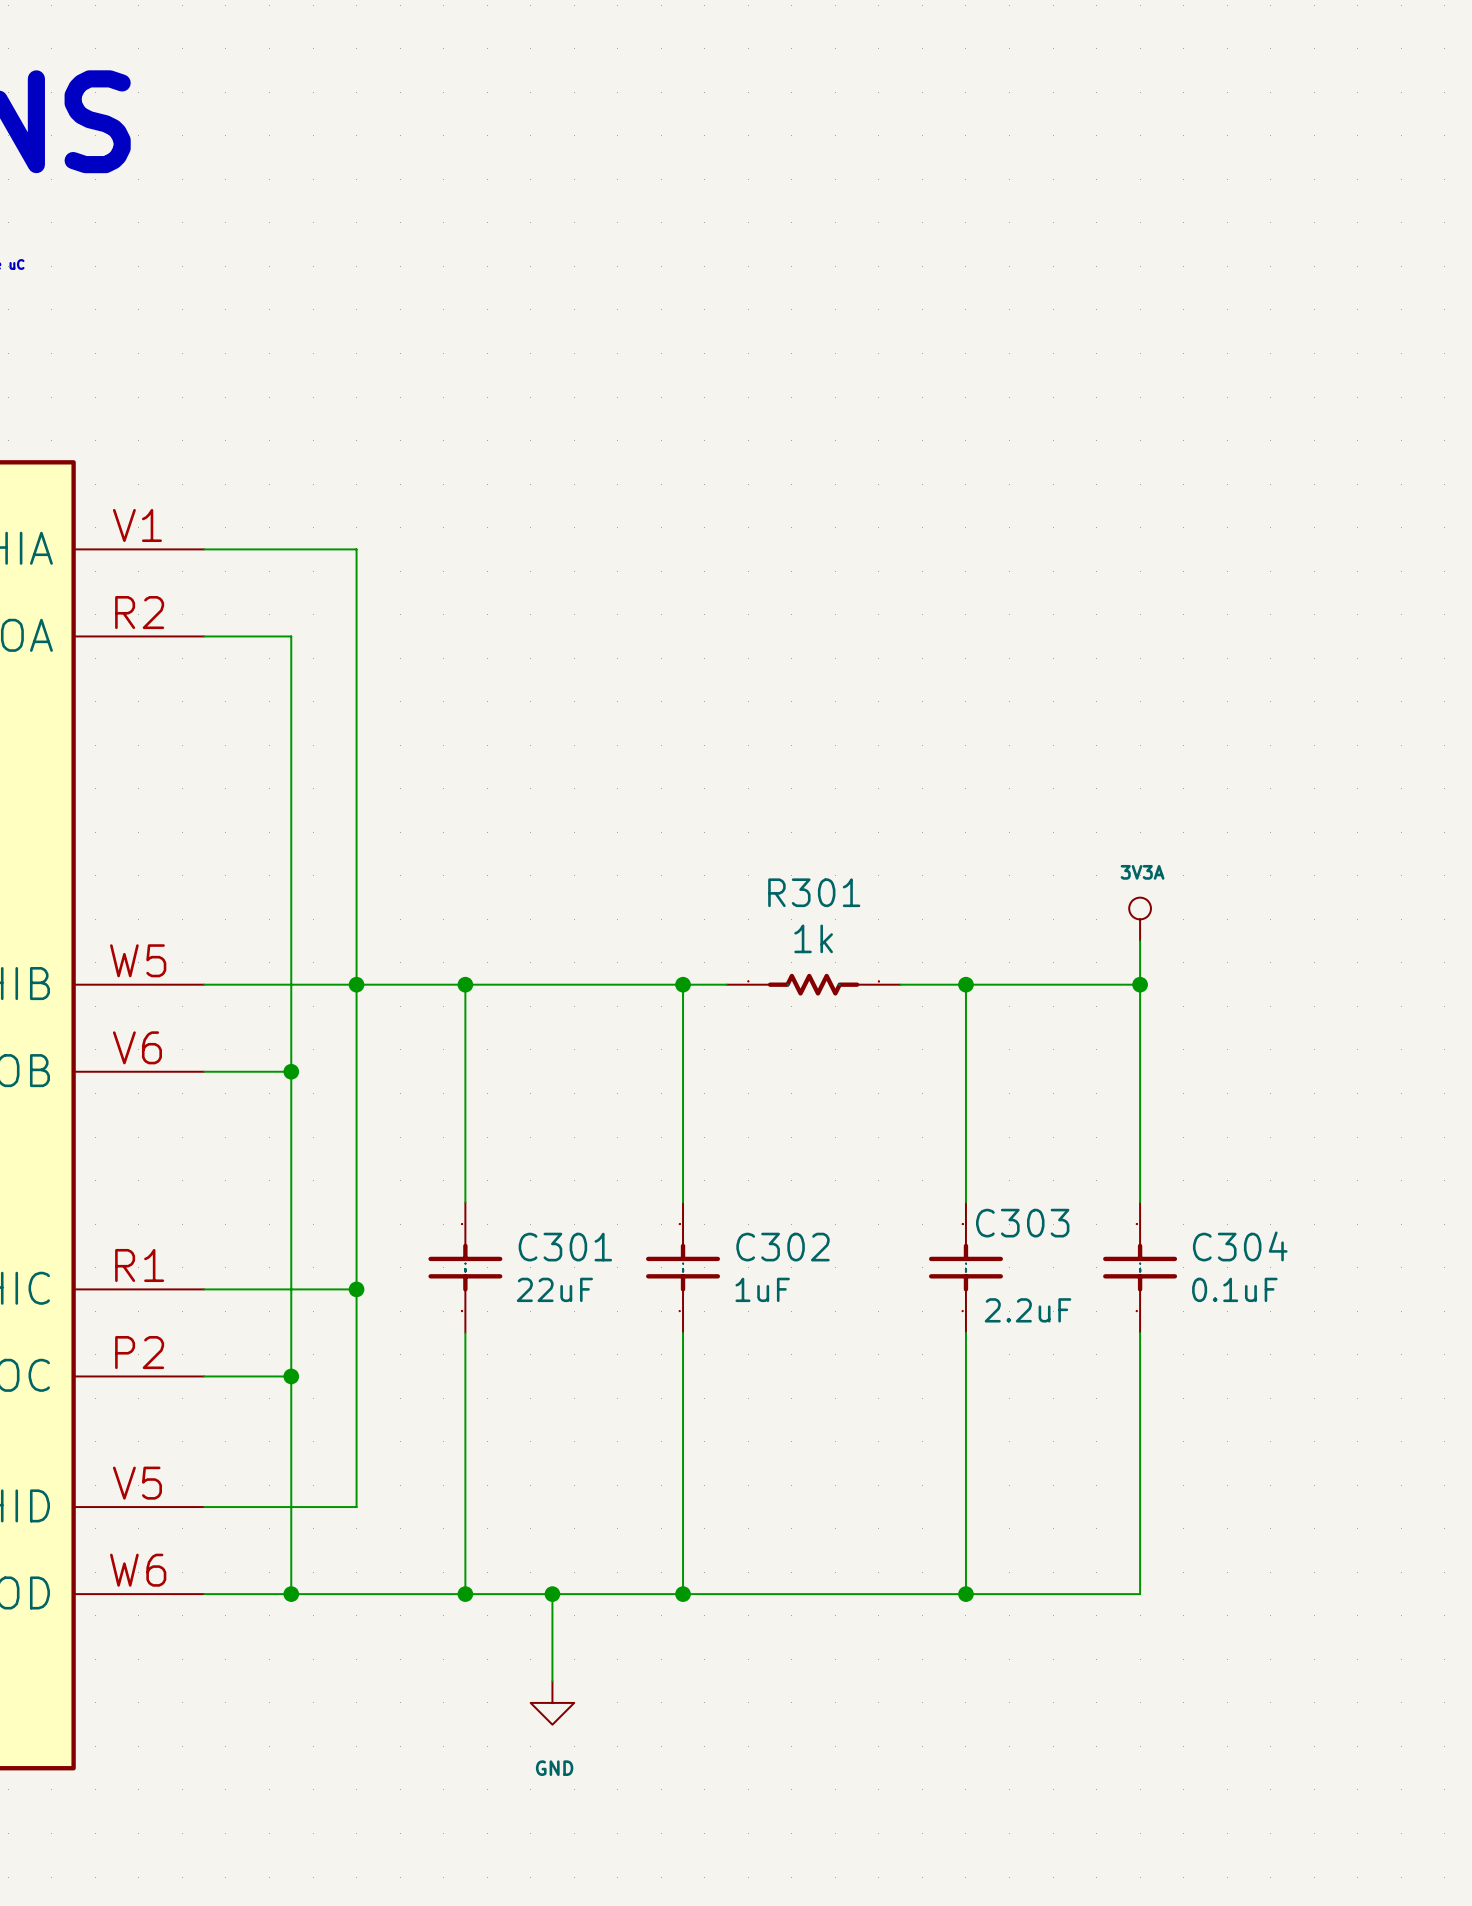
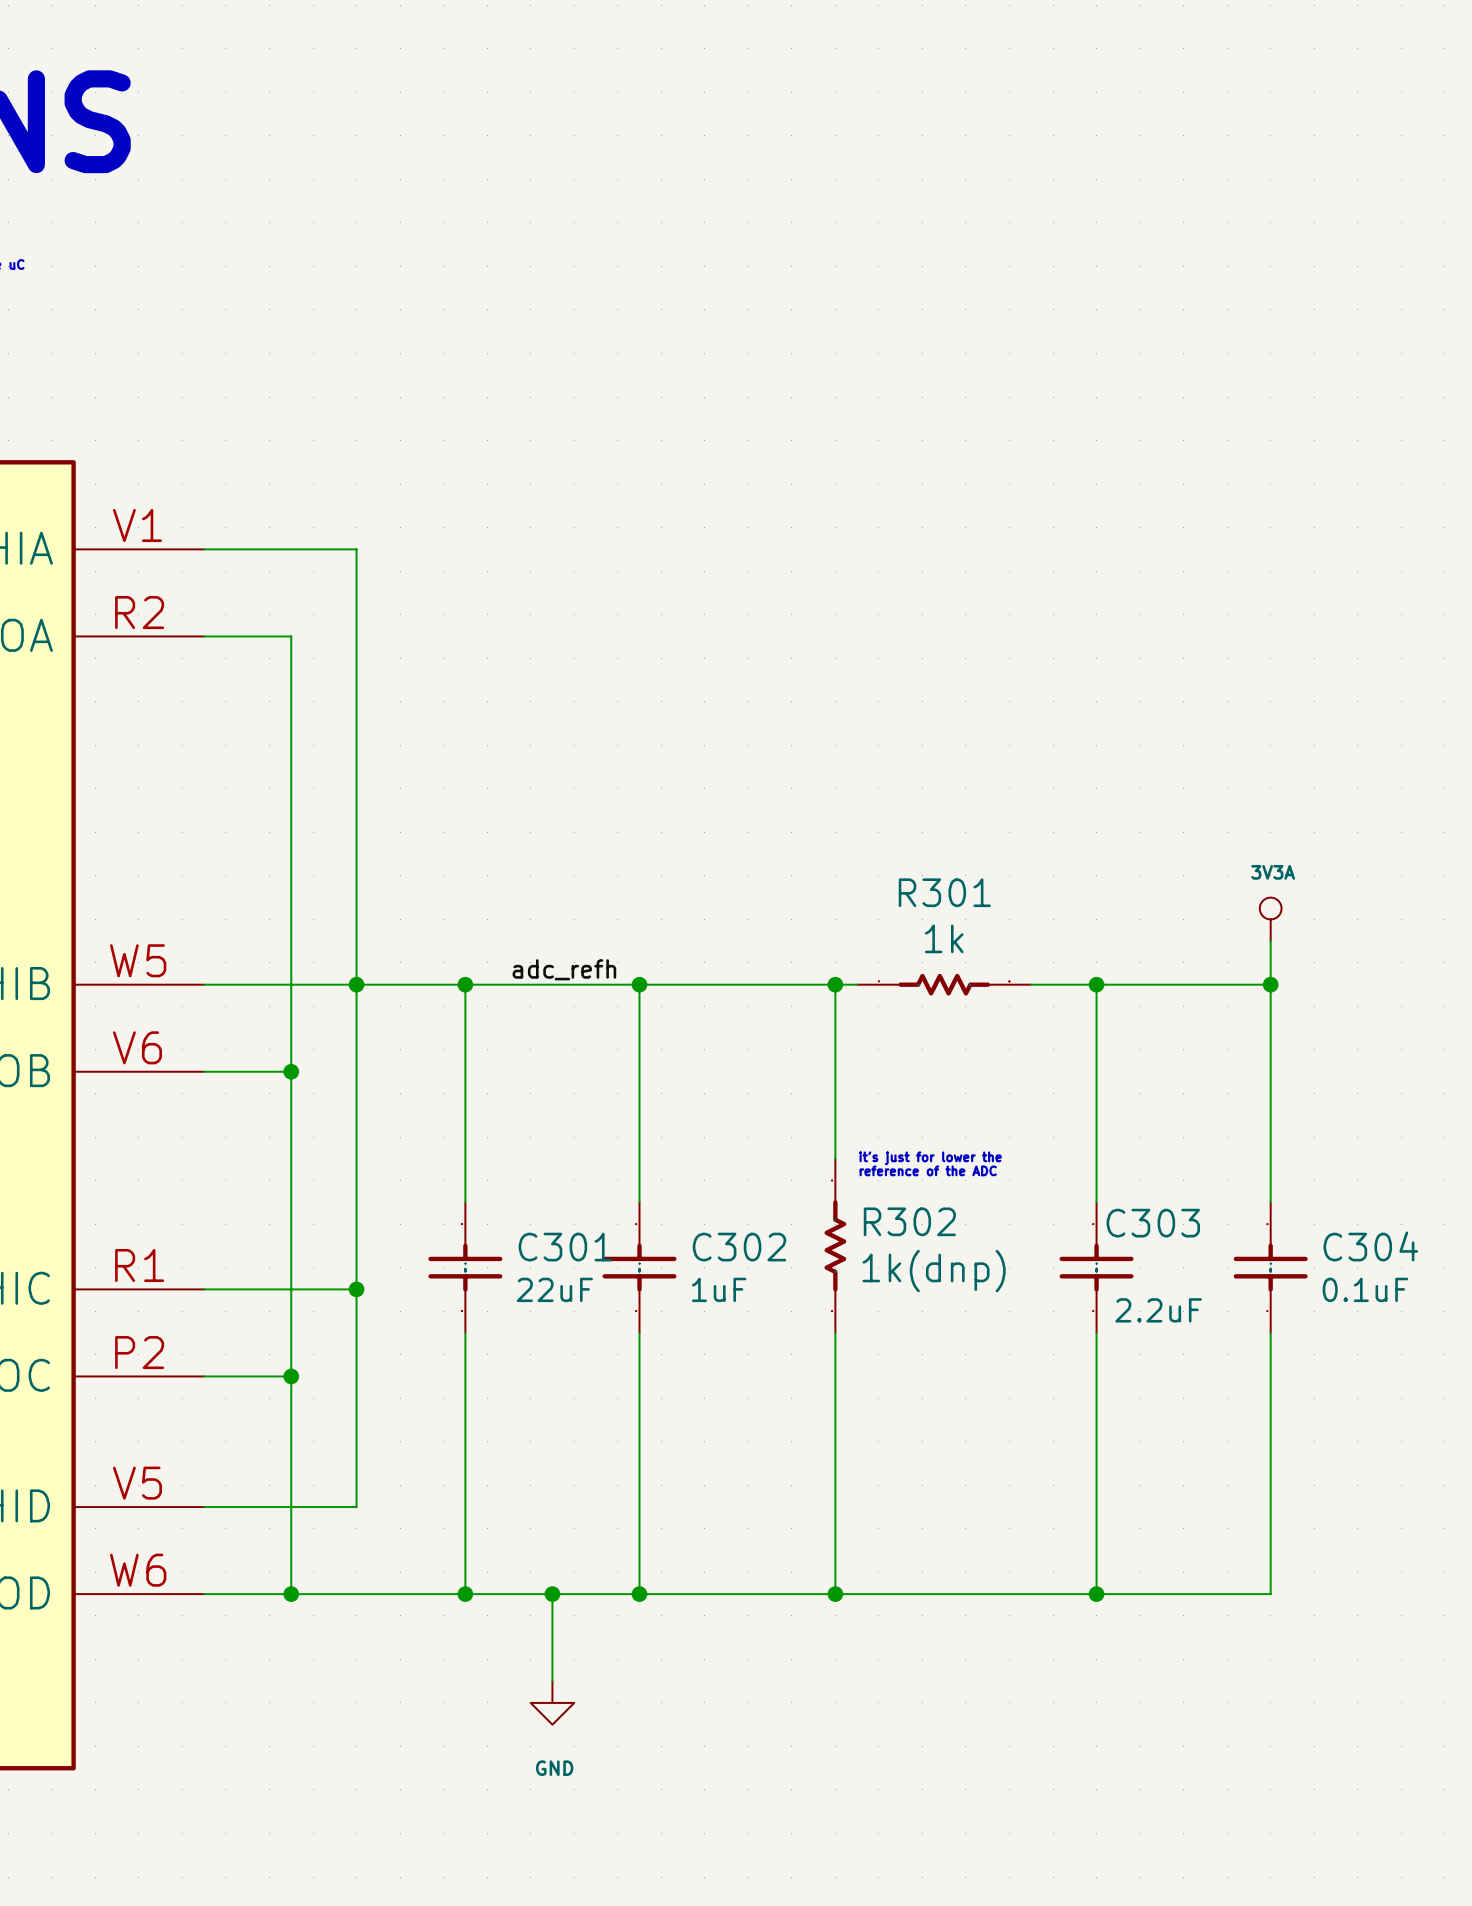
power symbol position: 3V3A (1140, 919) -> 3V3A (1270, 919)
wire: (1140, 941) (1140, 1202) -> (1270, 941) (1270, 1202)
label: none -> adc_refh (564, 969)
wire: (683, 984) (683, 1202) -> (639, 984) (639, 1202)
junction position: (683, 984) -> (639, 984)
R301 position: (813, 984) -> (944, 984)
wire: none -> (835, 984) (835, 1158)
junction: none -> (835, 984)
wire: (965, 984) (965, 1202) -> (1096, 984) (1096, 1202)
junction: (965, 984) -> none
wire: none -> (1140, 984) (1270, 984)
junction position: (1140, 984) -> (1096, 984)
junction: none -> (1270, 984)
text: none -> it's just for lower the (930, 1158)
text: none -> reference of the ADC (928, 1170)
R302: none -> 1k(dnp) (835, 1245)
C302 position: (683, 1267) -> (639, 1267)
C303 position: (965, 1267) -> (1096, 1267)
C304 position: (1140, 1267) -> (1270, 1267)
wire: (683, 1332) (683, 1594) -> (639, 1332) (639, 1594)
wire: none -> (835, 1332) (835, 1594)
wire: (965, 1332) (965, 1594) -> (1096, 1332) (1096, 1594)
wire: (1140, 1332) (1140, 1594) -> (1270, 1332) (1270, 1594) (1140, 1594)
junction position: (683, 1594) -> (639, 1594)
junction: none -> (835, 1594)
junction: (965, 1594) -> none
junction: none -> (1096, 1594)

